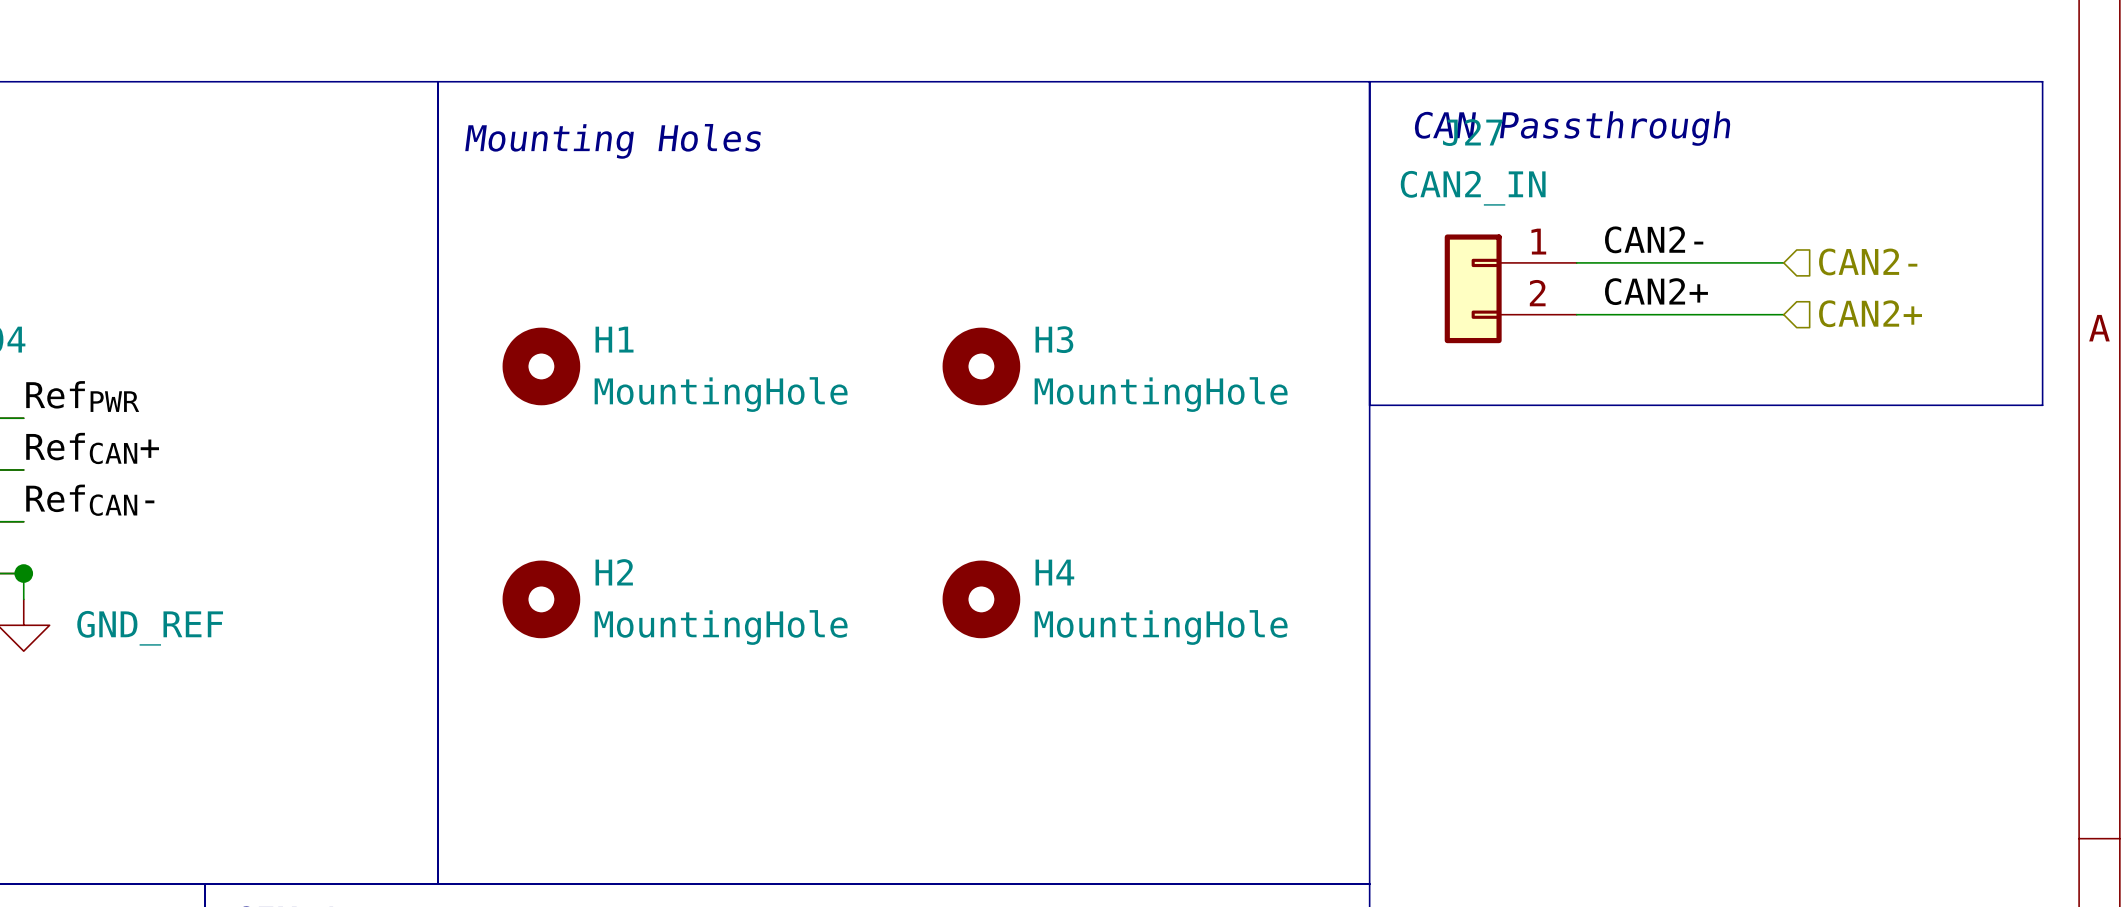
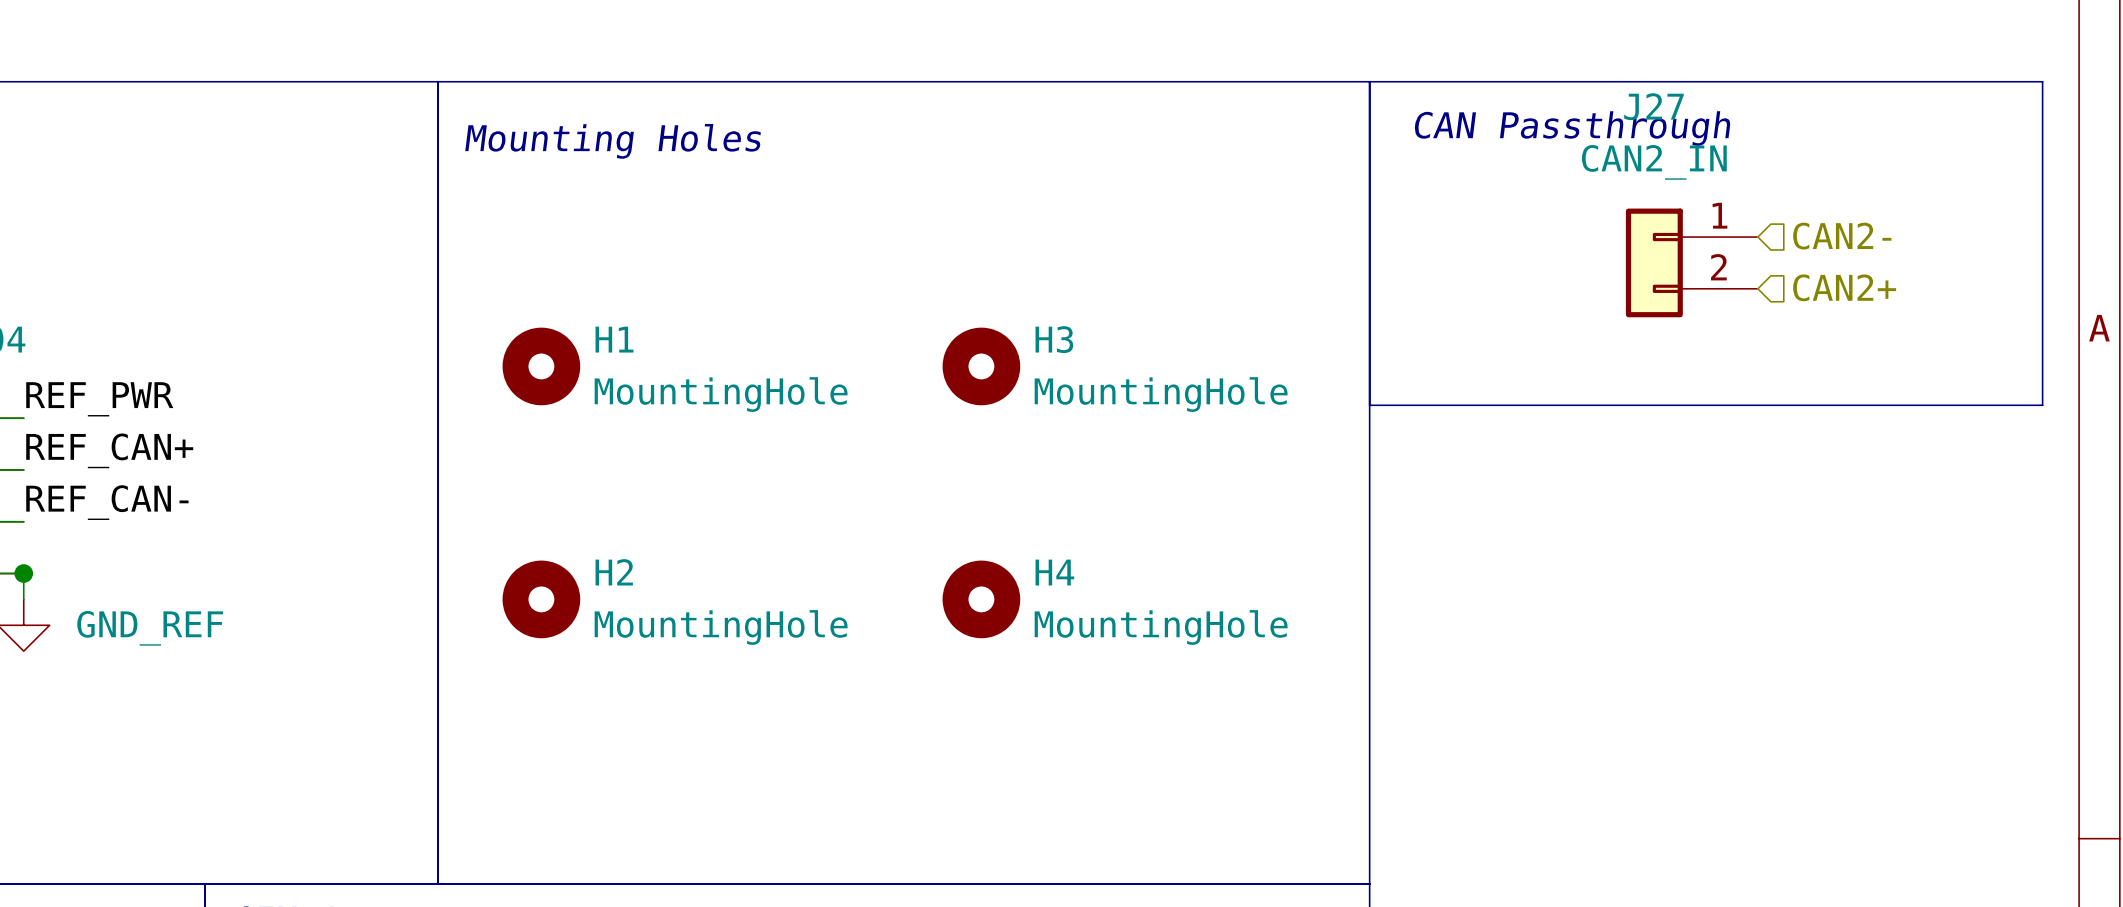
label: CAN2- (1654, 239) -> none
hierarchical label position: CAN2- (1868, 261) -> CAN2- (1842, 236)
wire: (1576, 262) (1783, 262) -> none
J27 position: (1510, 288) -> (1691, 262)
label: CAN2+ (1656, 291) -> none
hierarchical label position: CAN2+ (1870, 313) -> CAN2+ (1844, 287)
wire: (1576, 314) (1783, 314) -> none
label: RefPWR (82, 396) -> REF_PWR (99, 399)
label: RefCAN+ (92, 448) -> REF_CAN+ (109, 450)
label: RefCAN- (90, 500) -> REF_CAN- (107, 502)

